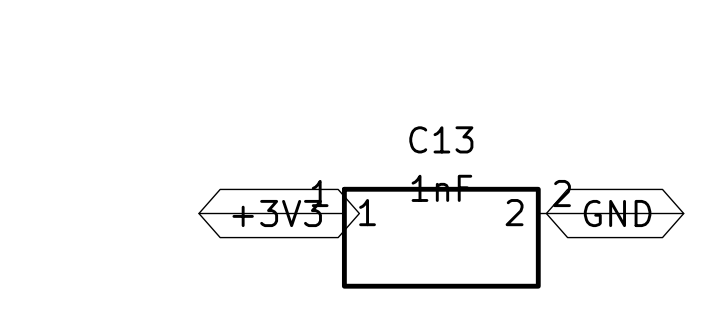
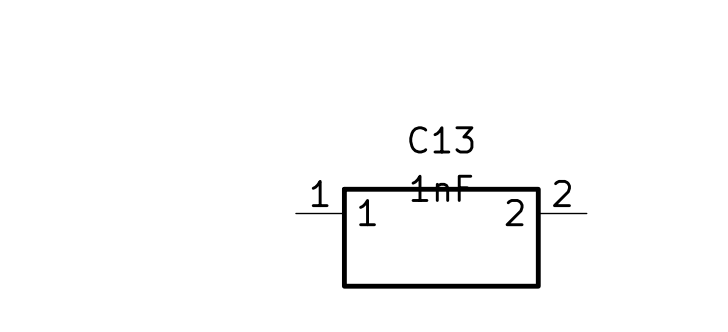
wire: (198, 213) (295, 213) -> none
global label: +3V3 (277, 213) -> none
wire: (586, 213) (683, 213) -> none
global label: GND (617, 213) -> none

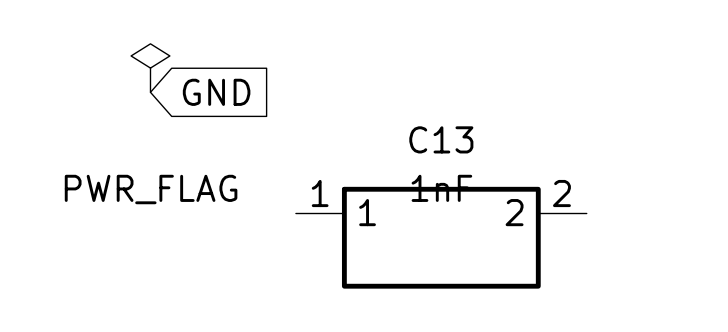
power symbol: none -> PWR_FLAG (150, 68)
global label: none -> GND (216, 92)

